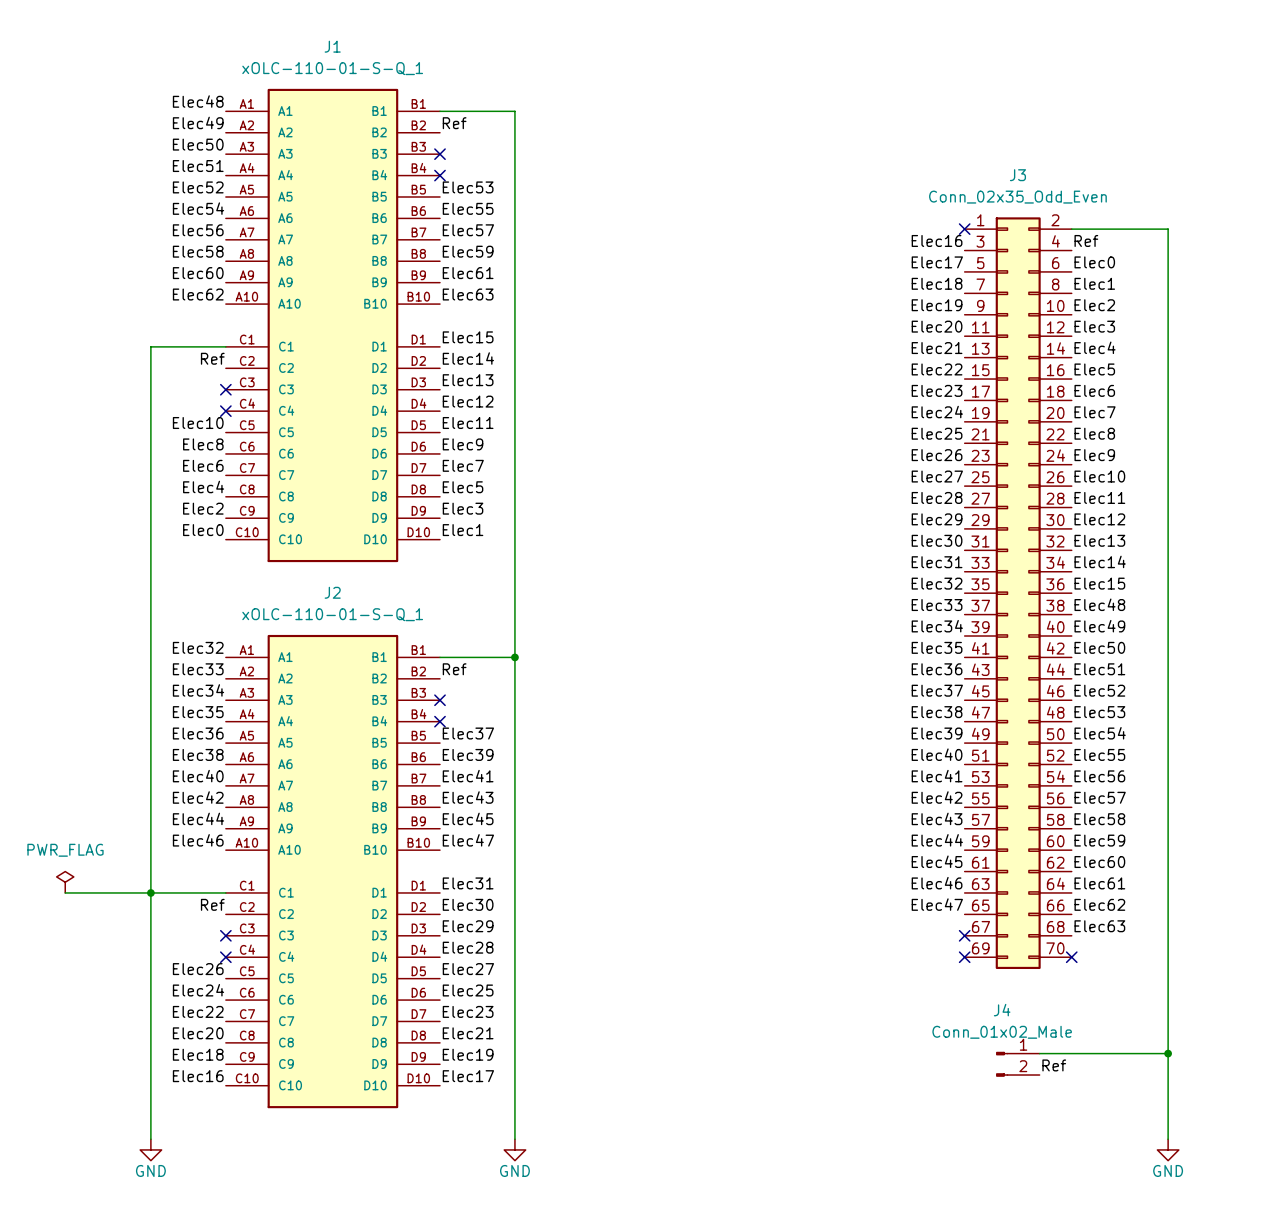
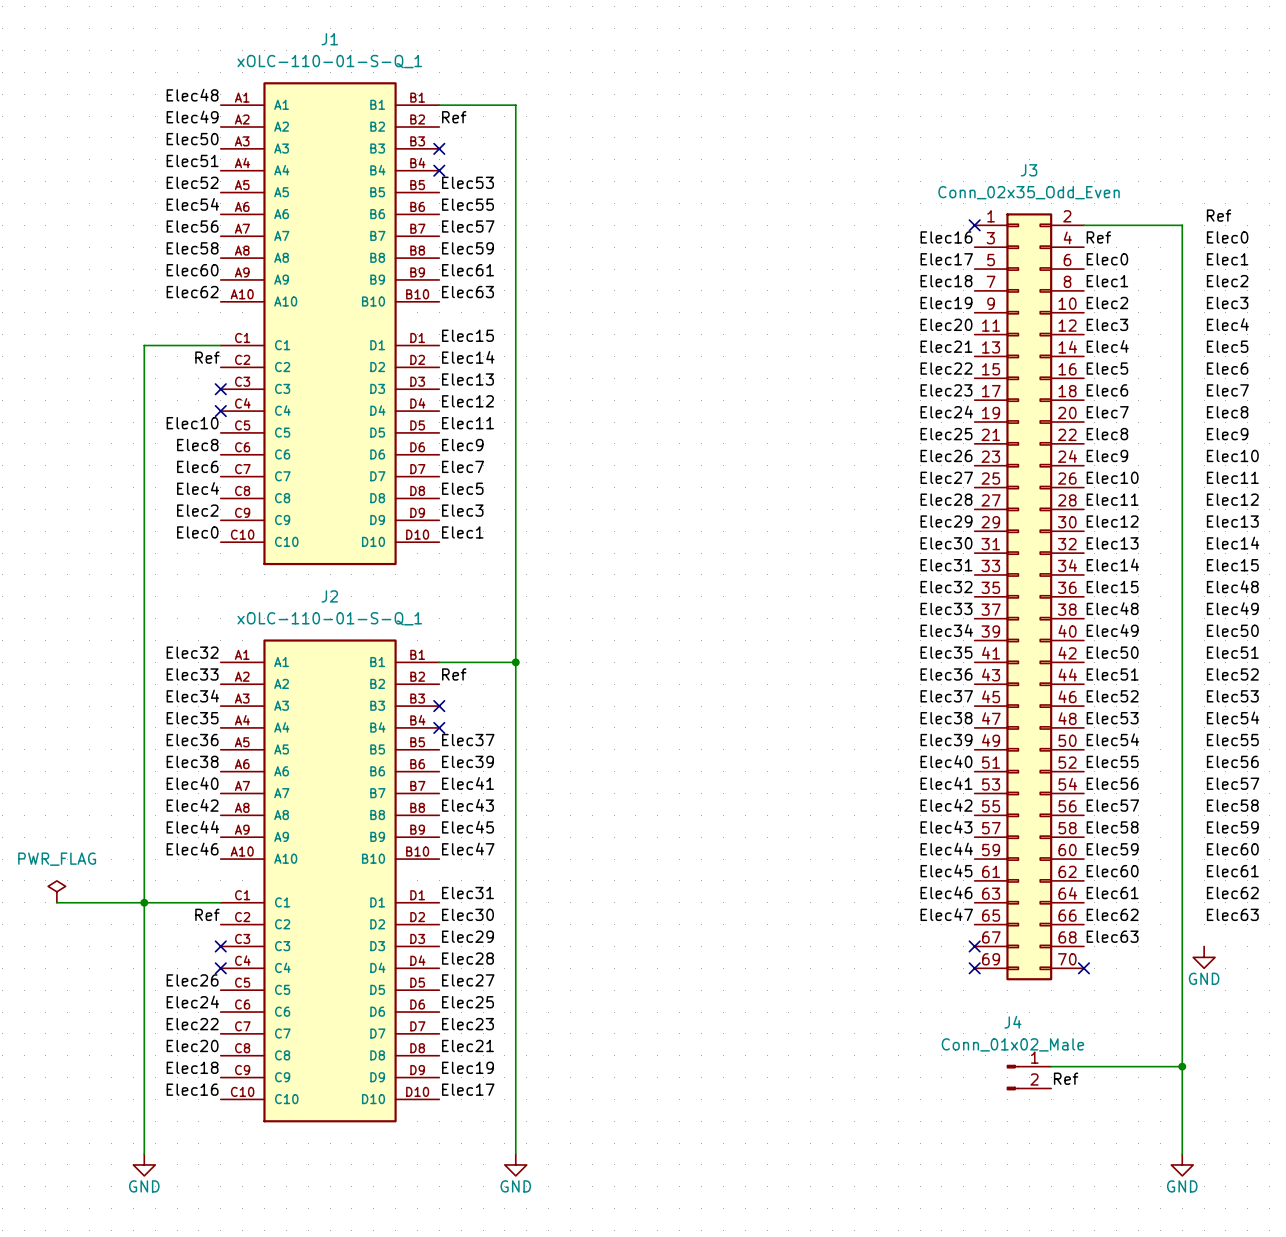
label: none -> Ref (1219, 215)
label: none -> Elec0 (1227, 237)
label: none -> Elec1 (1227, 259)
label: none -> Elec2 (1227, 281)
label: none -> Elec3 (1227, 302)
label: none -> Elec4 (1227, 324)
label: none -> Elec5 (1227, 346)
label: none -> Elec6 (1227, 368)
label: none -> Elec7 (1227, 390)
label: none -> Elec8 (1227, 412)
label: none -> Elec9 (1227, 434)
label: none -> Elec10 (1232, 455)
label: none -> Elec11 (1232, 477)
label: none -> Elec12 (1232, 499)
label: none -> Elec13 (1232, 521)
label: none -> Elec14 (1233, 543)
label: none -> Elec15 (1232, 565)
label: none -> Elec48 (1232, 586)
label: none -> Elec49 (1232, 608)
label: none -> Elec50 (1232, 630)
label: none -> Elec51 (1232, 652)
label: none -> Elec52 (1232, 674)
label: none -> Elec53 (1232, 696)
label: none -> Elec54 (1233, 717)
label: none -> Elec55 (1232, 740)
label: none -> Elec56 (1232, 761)
label: none -> Elec57 (1233, 783)
label: none -> Elec58 (1232, 805)
label: none -> Elec59 (1232, 827)
label: none -> Elec60 (1232, 849)
label: none -> Elec61 (1232, 871)
label: none -> Elec62 (1232, 893)
label: none -> Elec63 (1232, 914)
power symbol: none -> GND (1204, 957)

